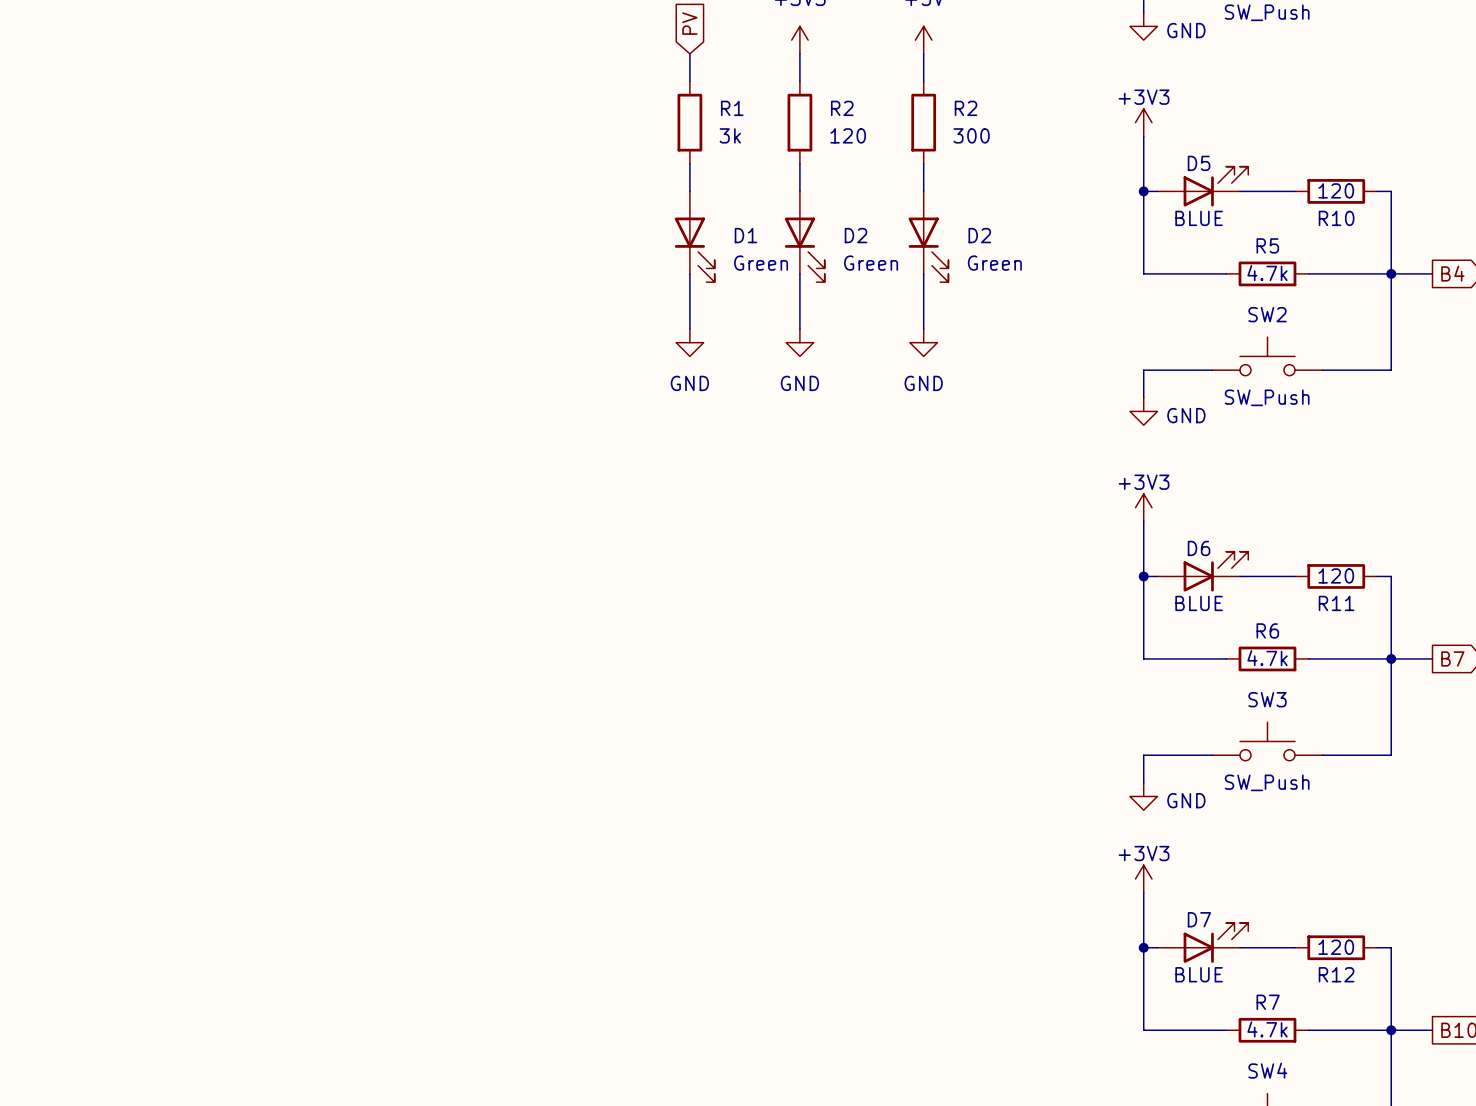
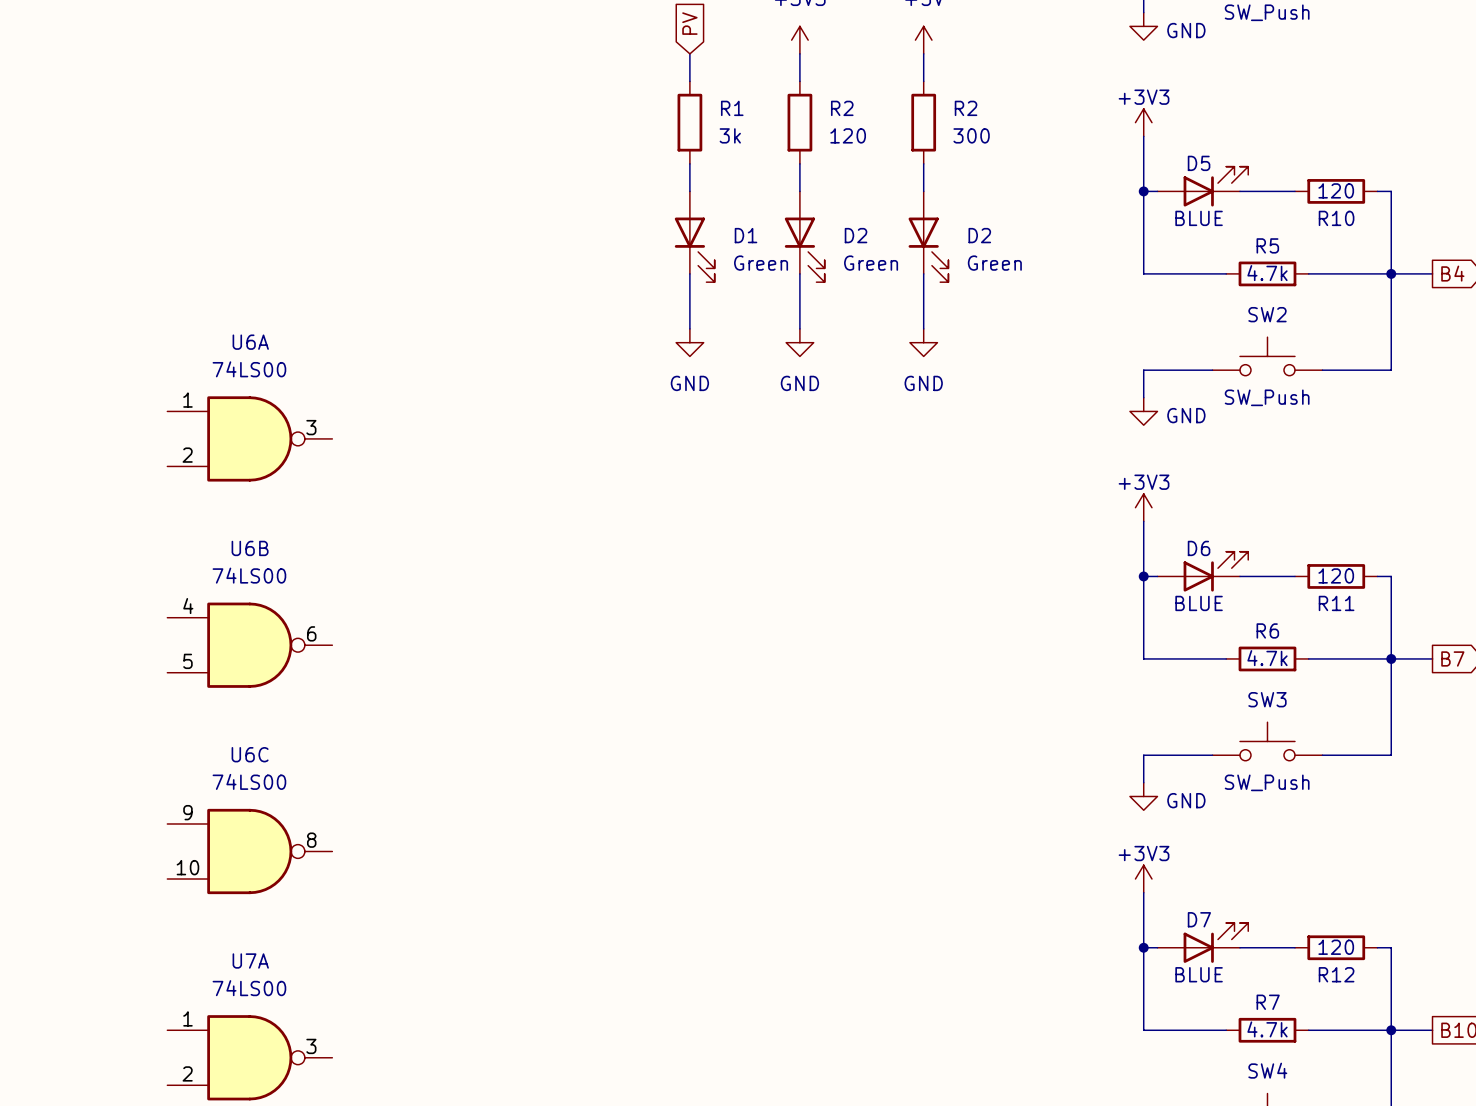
U6A: none -> 74LS00 (249, 438)
U6B: none -> 74LS00 (249, 645)
U6C: none -> 74LS00 (249, 851)
U7A: none -> 74LS00 (249, 1057)

